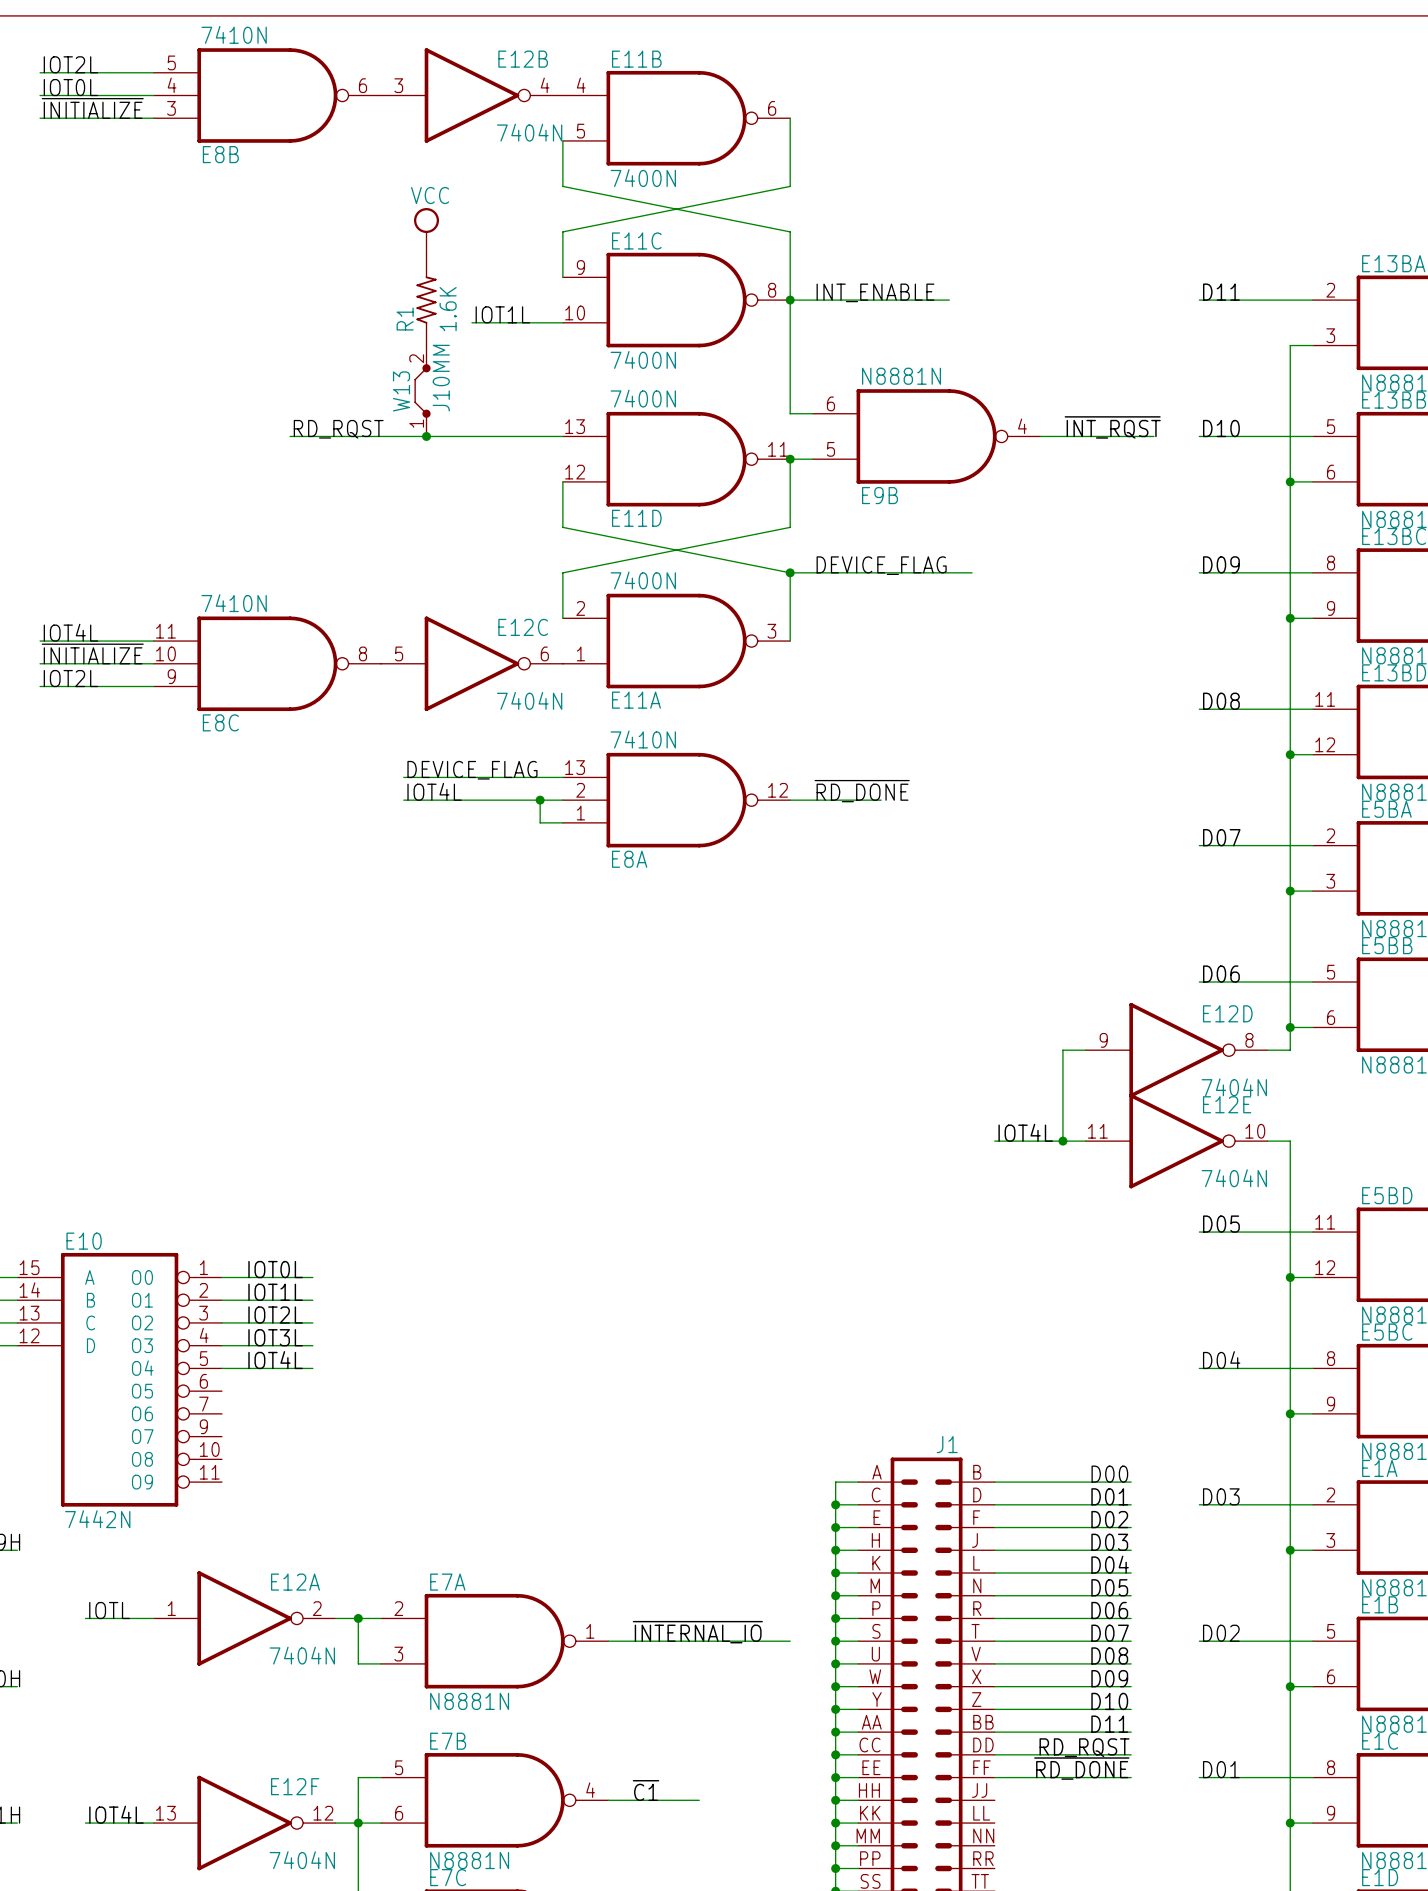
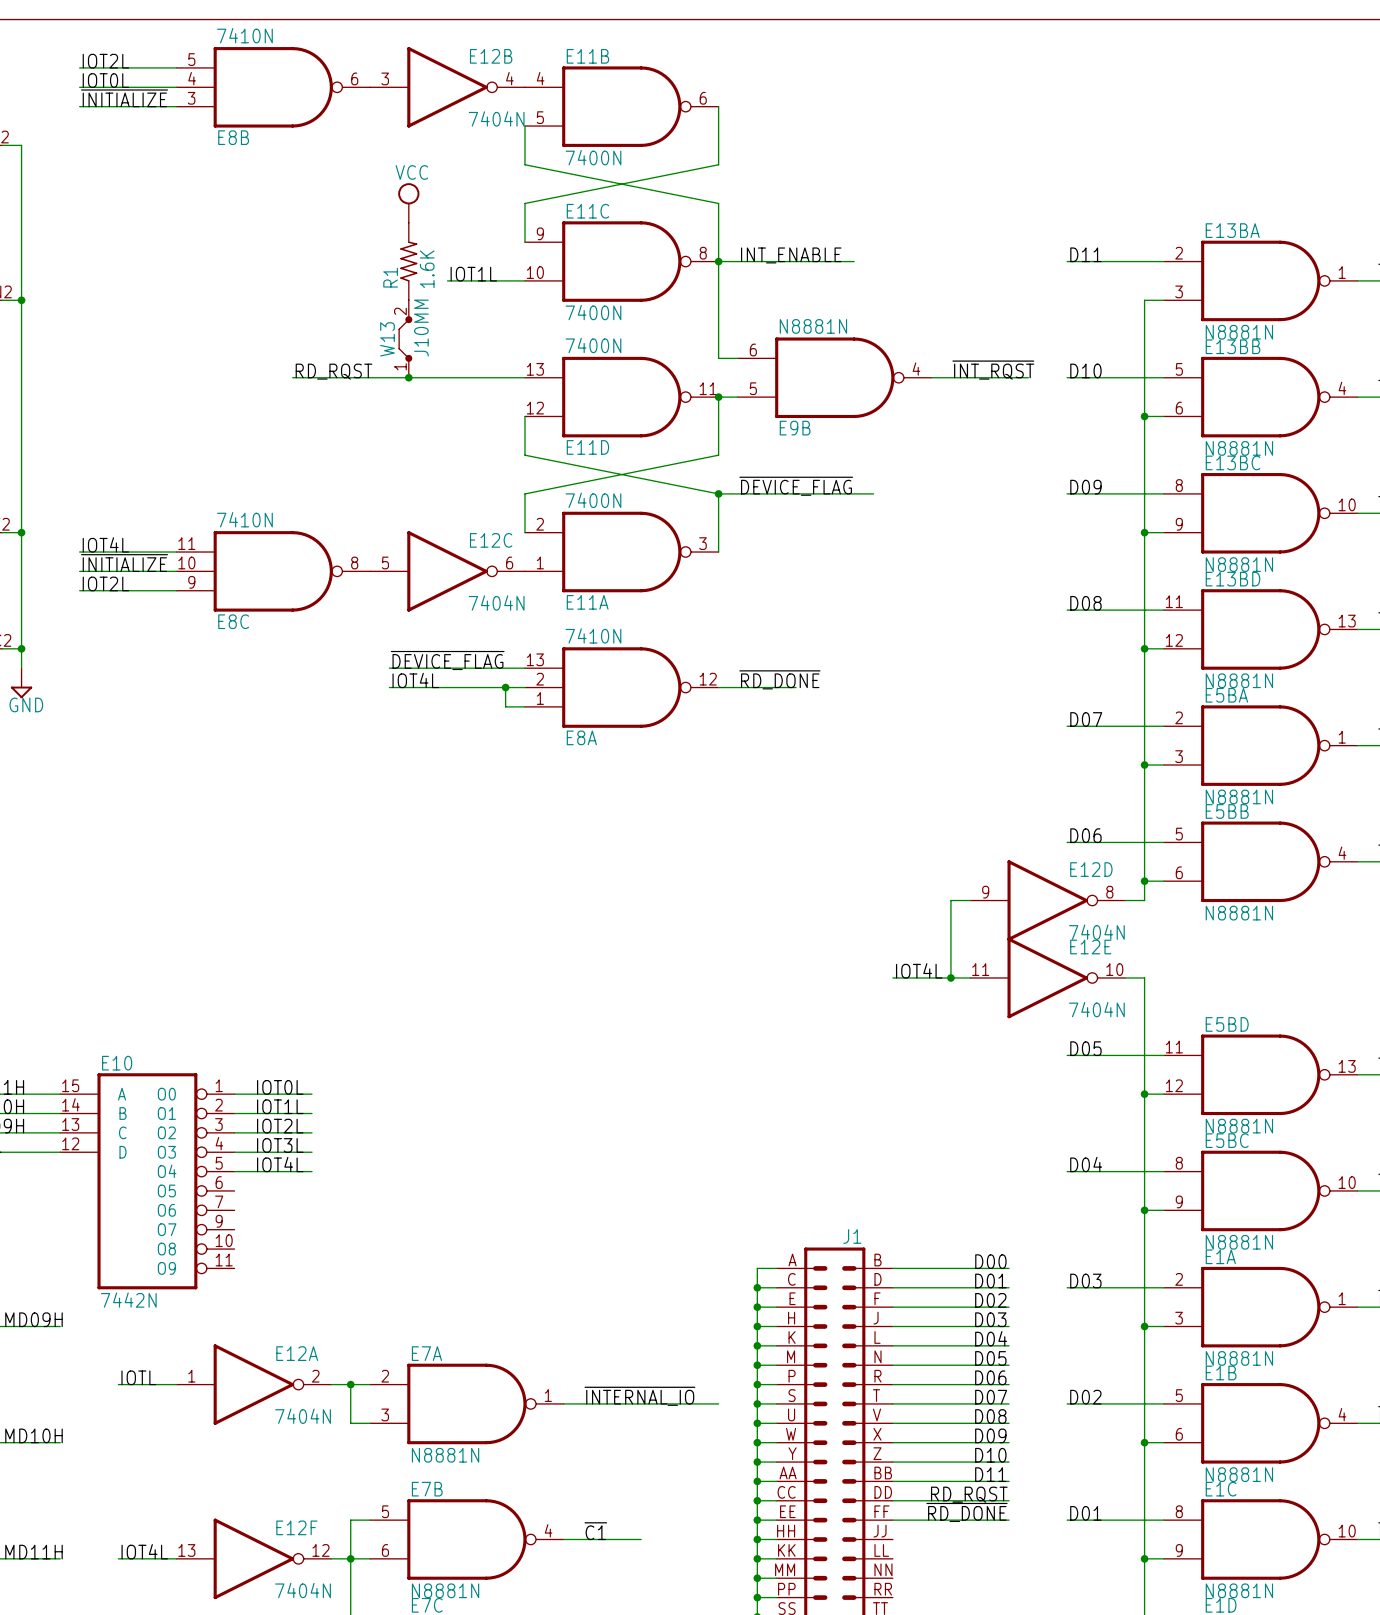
label: DEVICE_FLAG (881, 565) -> ~{DEVICE_FLAG} (796, 486)
label: DEVICE_FLAG (472, 770) -> ~{DEVICE_FLAG} (447, 660)

